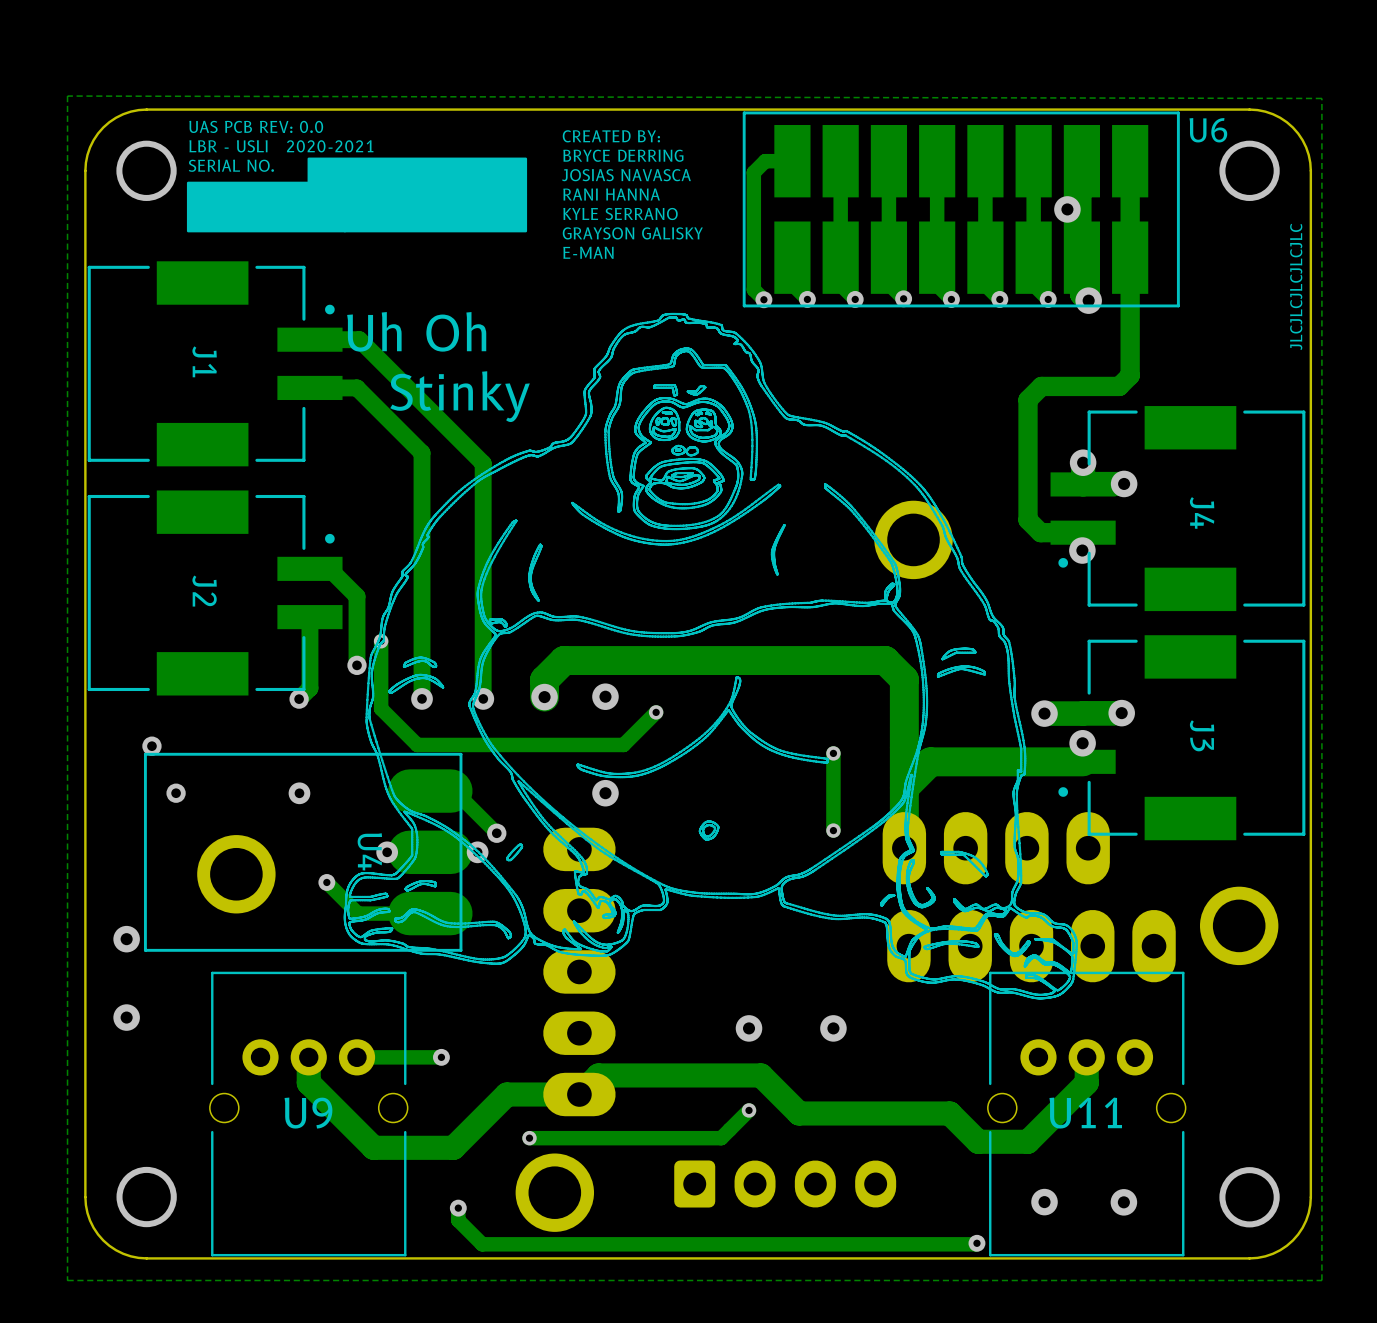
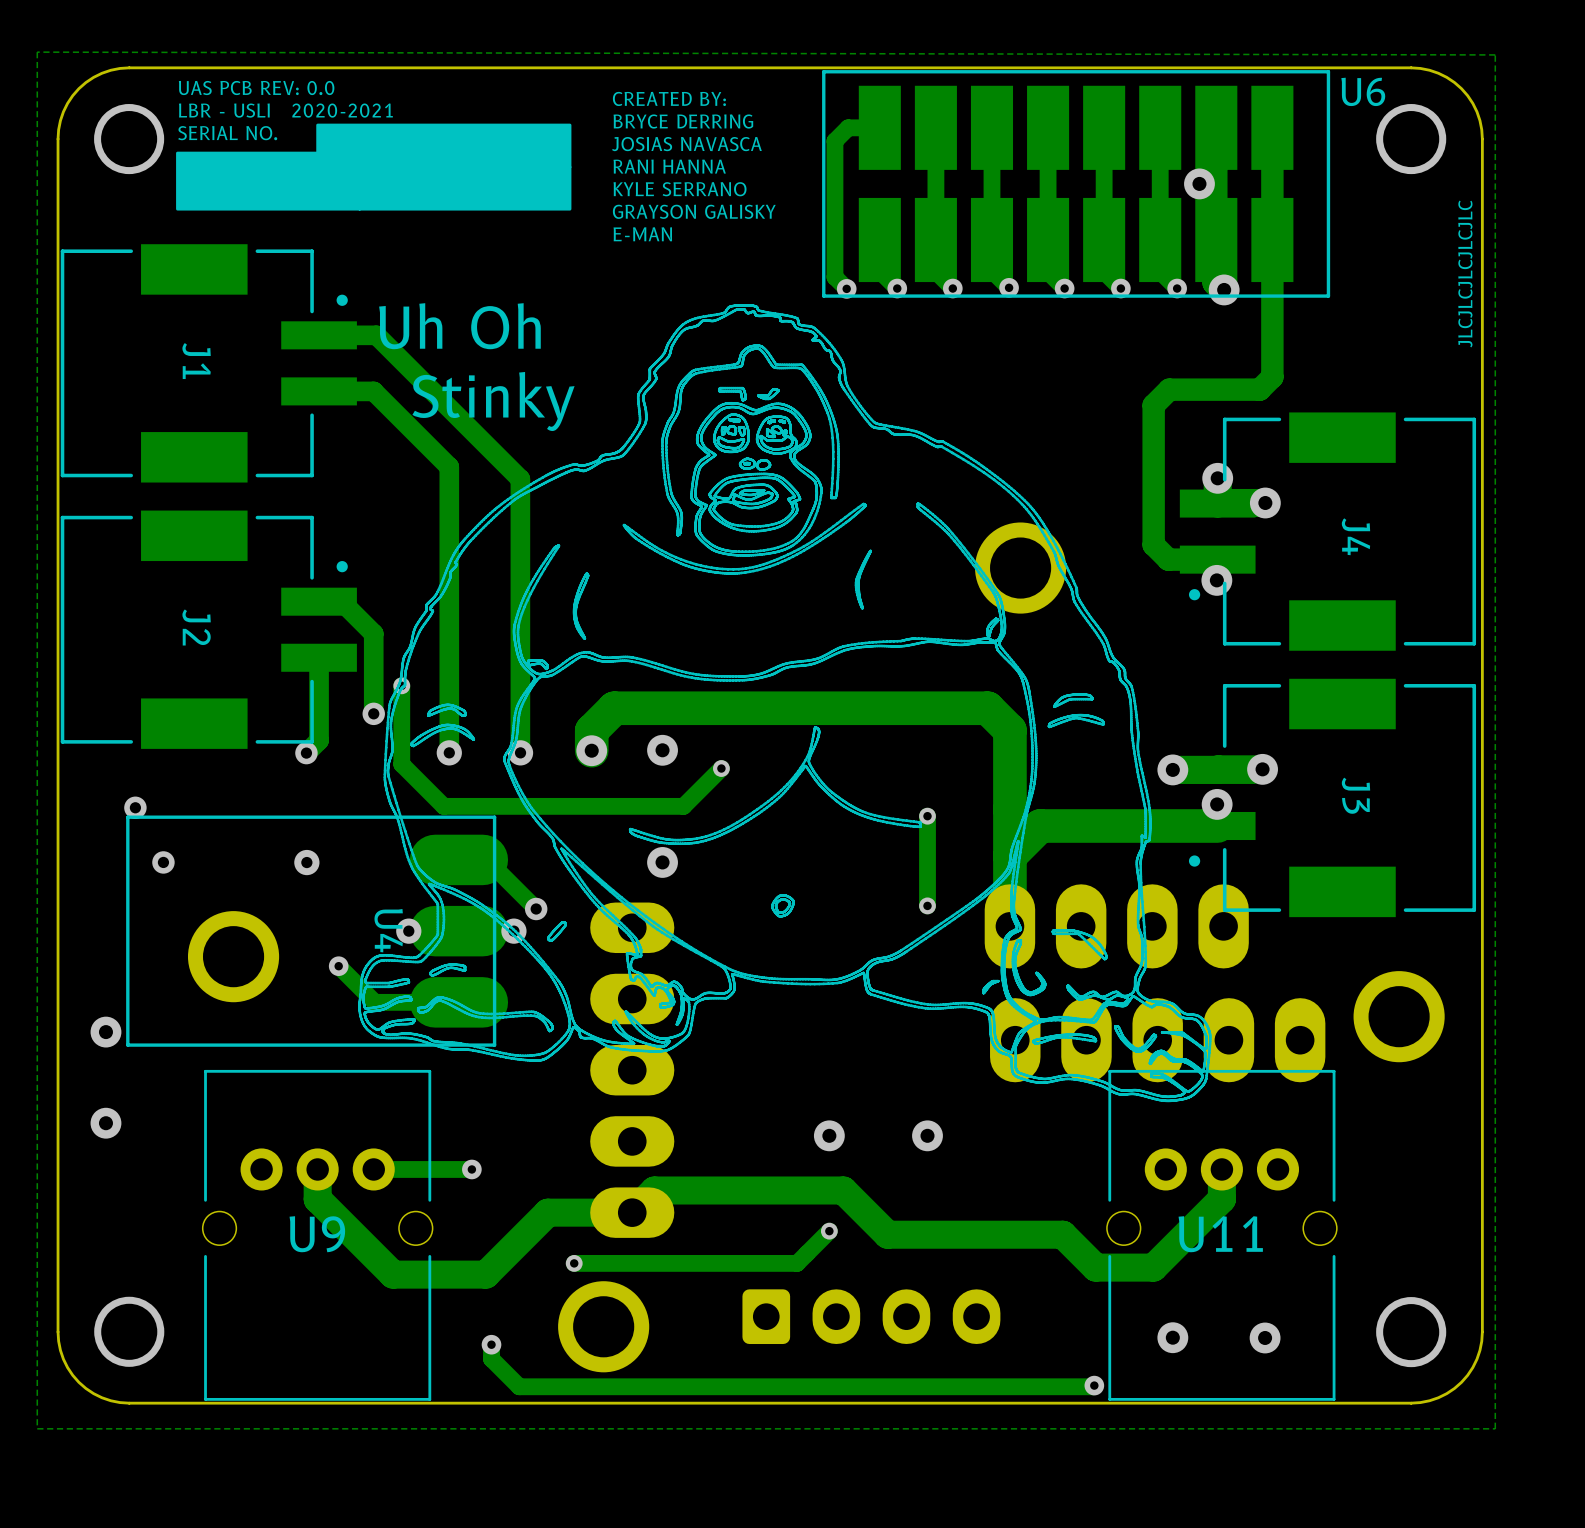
text position: Uh Oh (416, 331) -> Uh Oh (459, 326)

